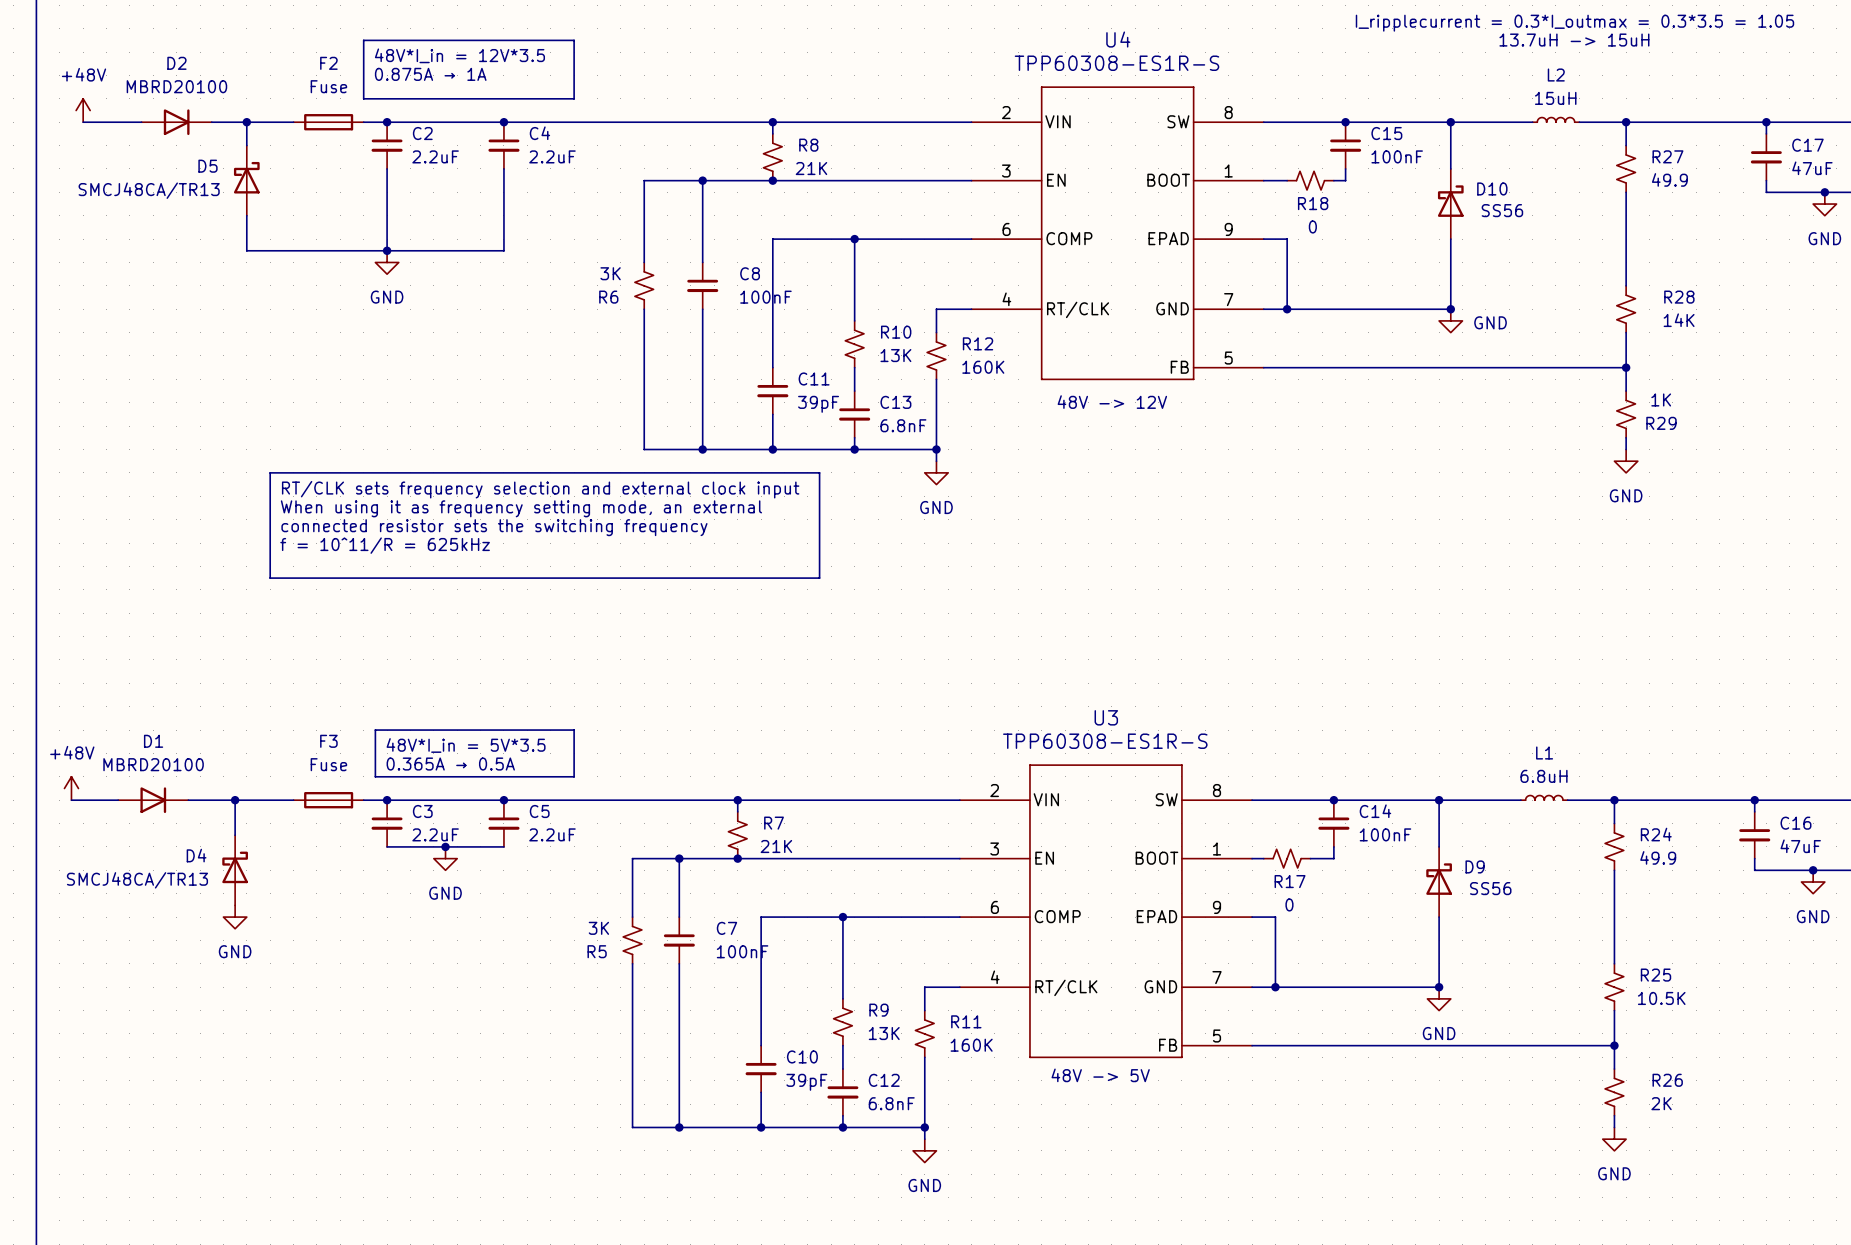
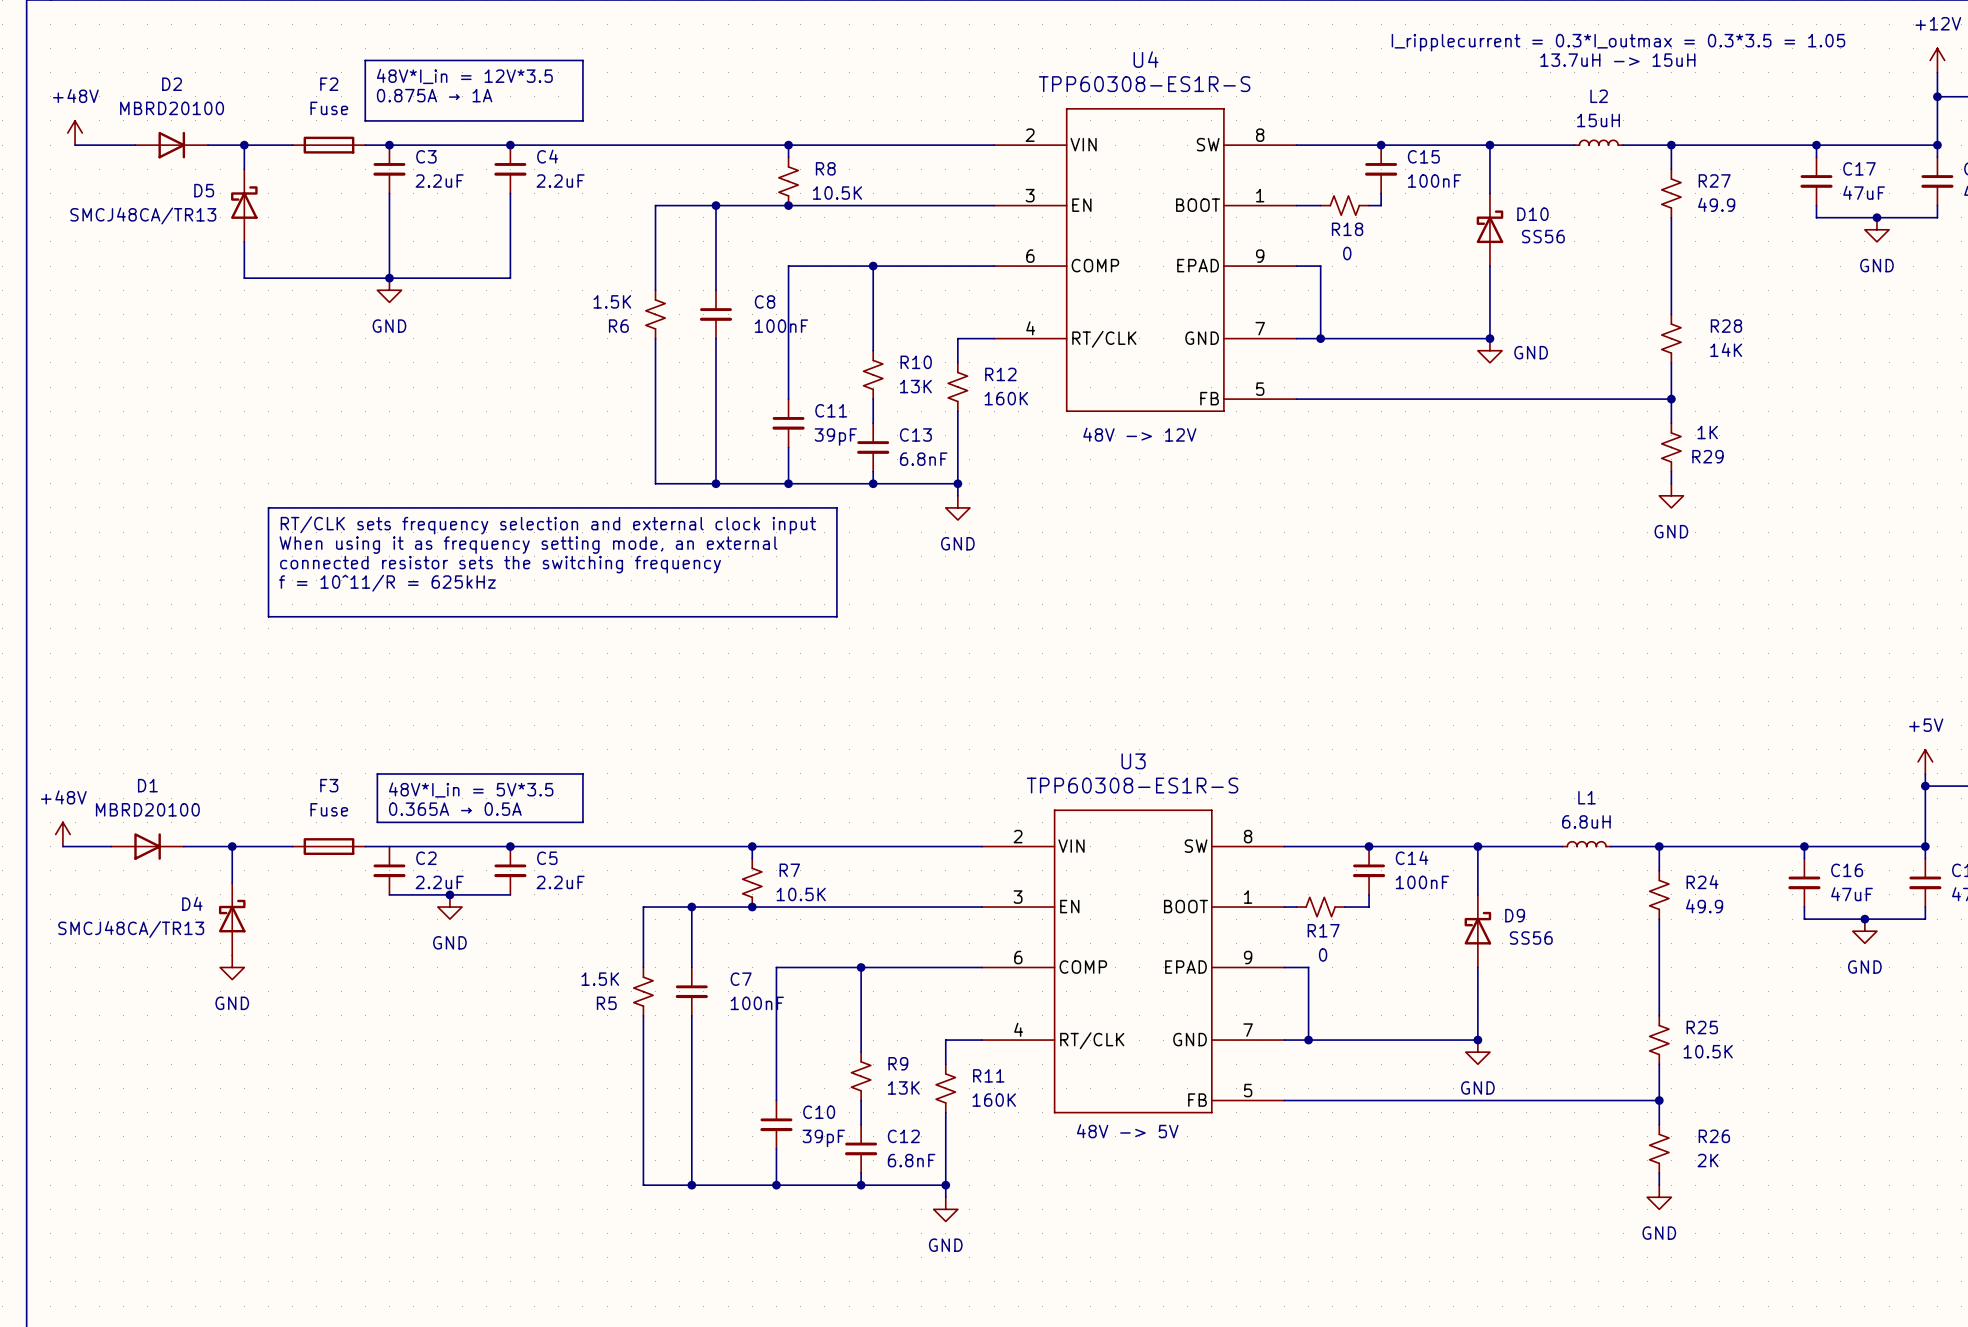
C2 name: C2 (422, 133) -> C3 (426, 156)
R8 value: 21K (811, 168) -> 10.5K (837, 193)
R6 value: 3K (610, 273) -> 1.5K (612, 301)
junction: (387, 800) -> none
C3 name: C3 (422, 811) -> C2 (426, 858)
R7 value: 21K (776, 846) -> 10.5K (801, 894)
R5 value: 3K (598, 928) -> 1.5K (600, 979)

